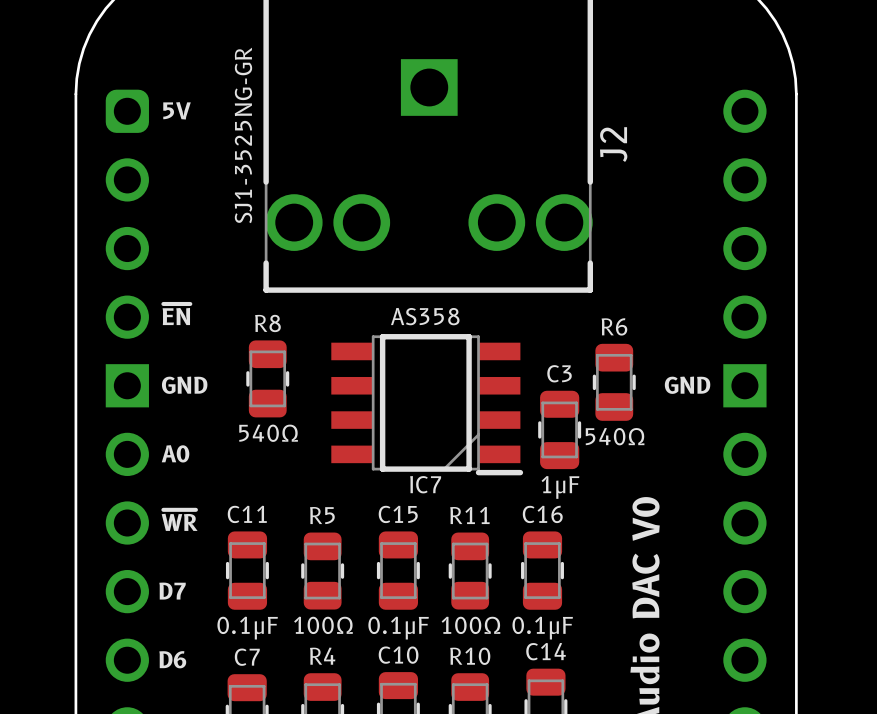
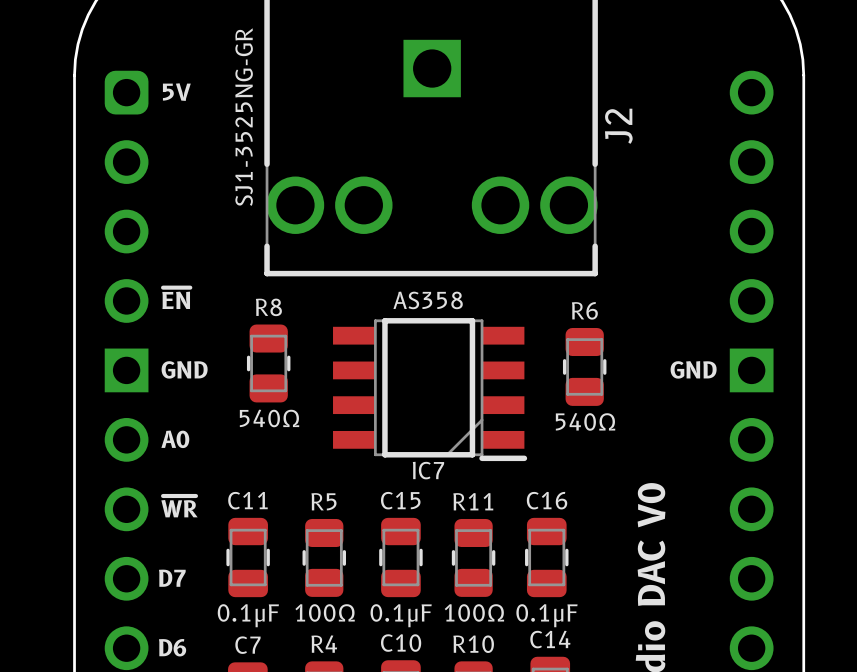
R6 position: (614, 382) -> (584, 366)
C3: 1μF (559, 429) -> none

